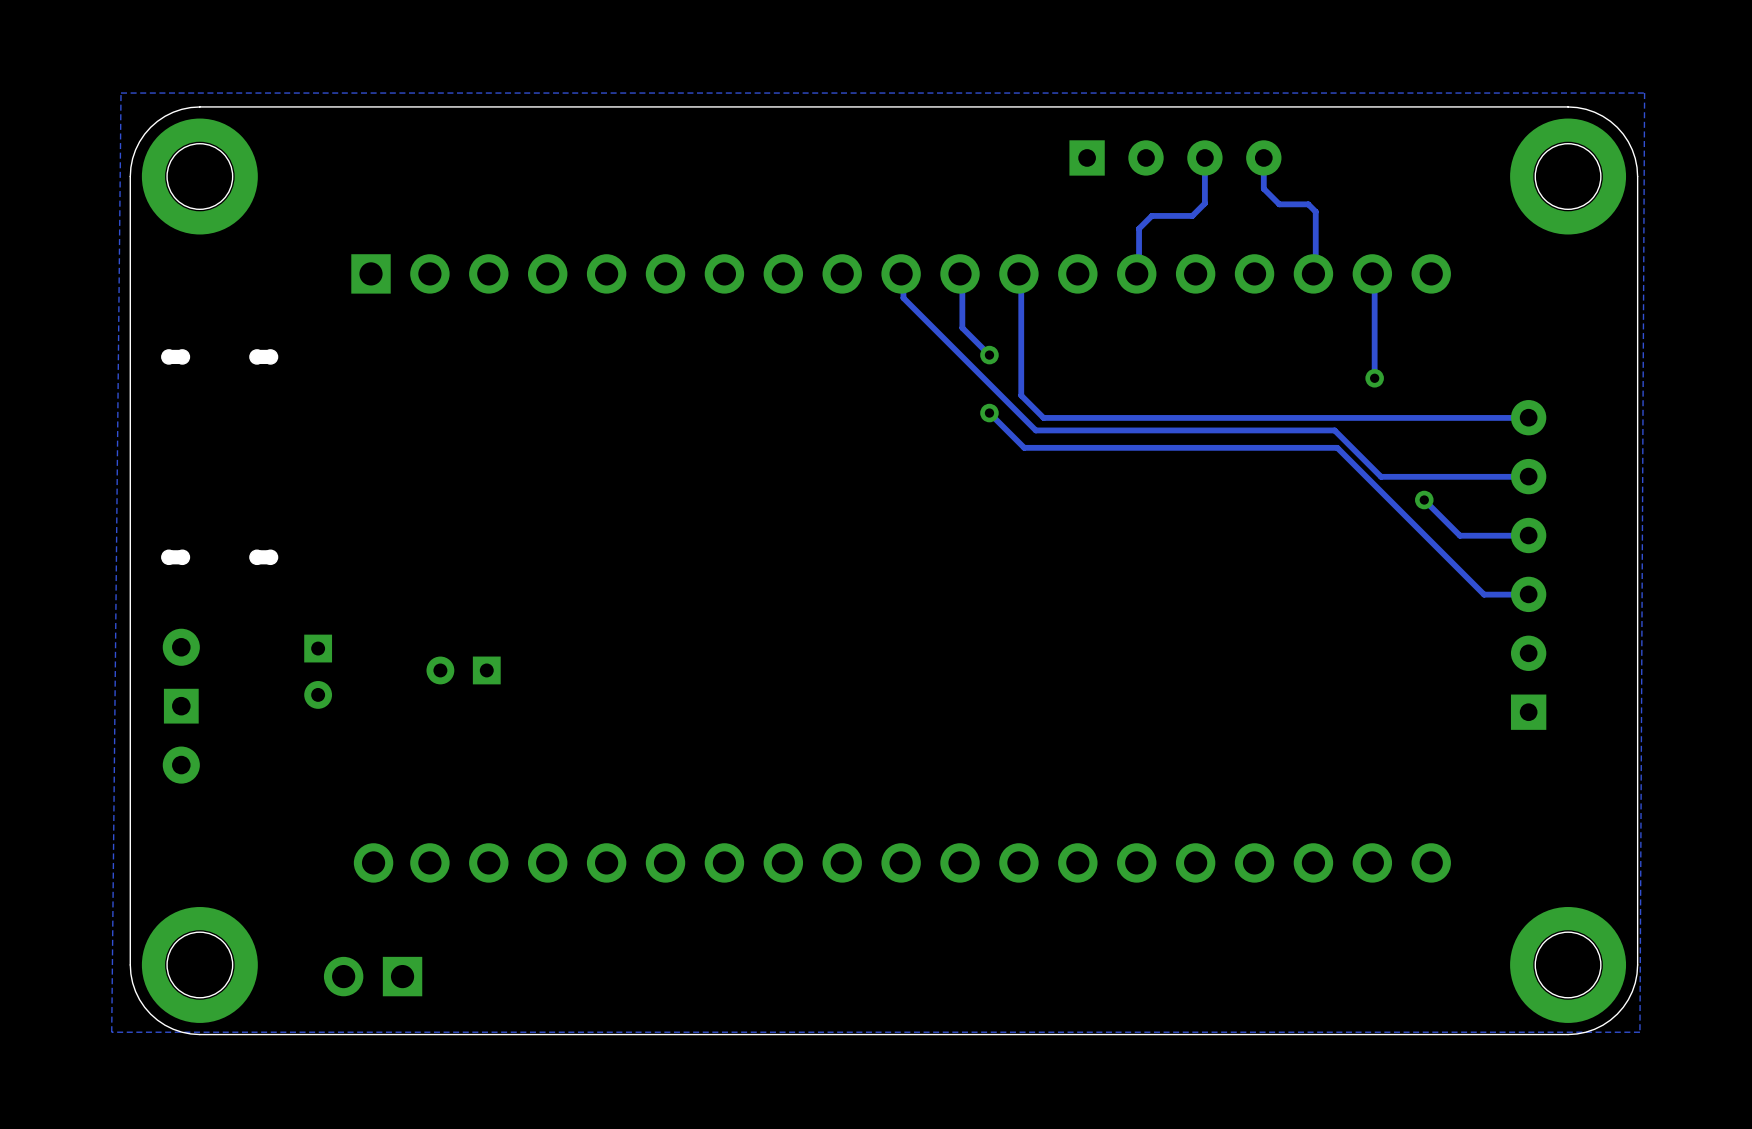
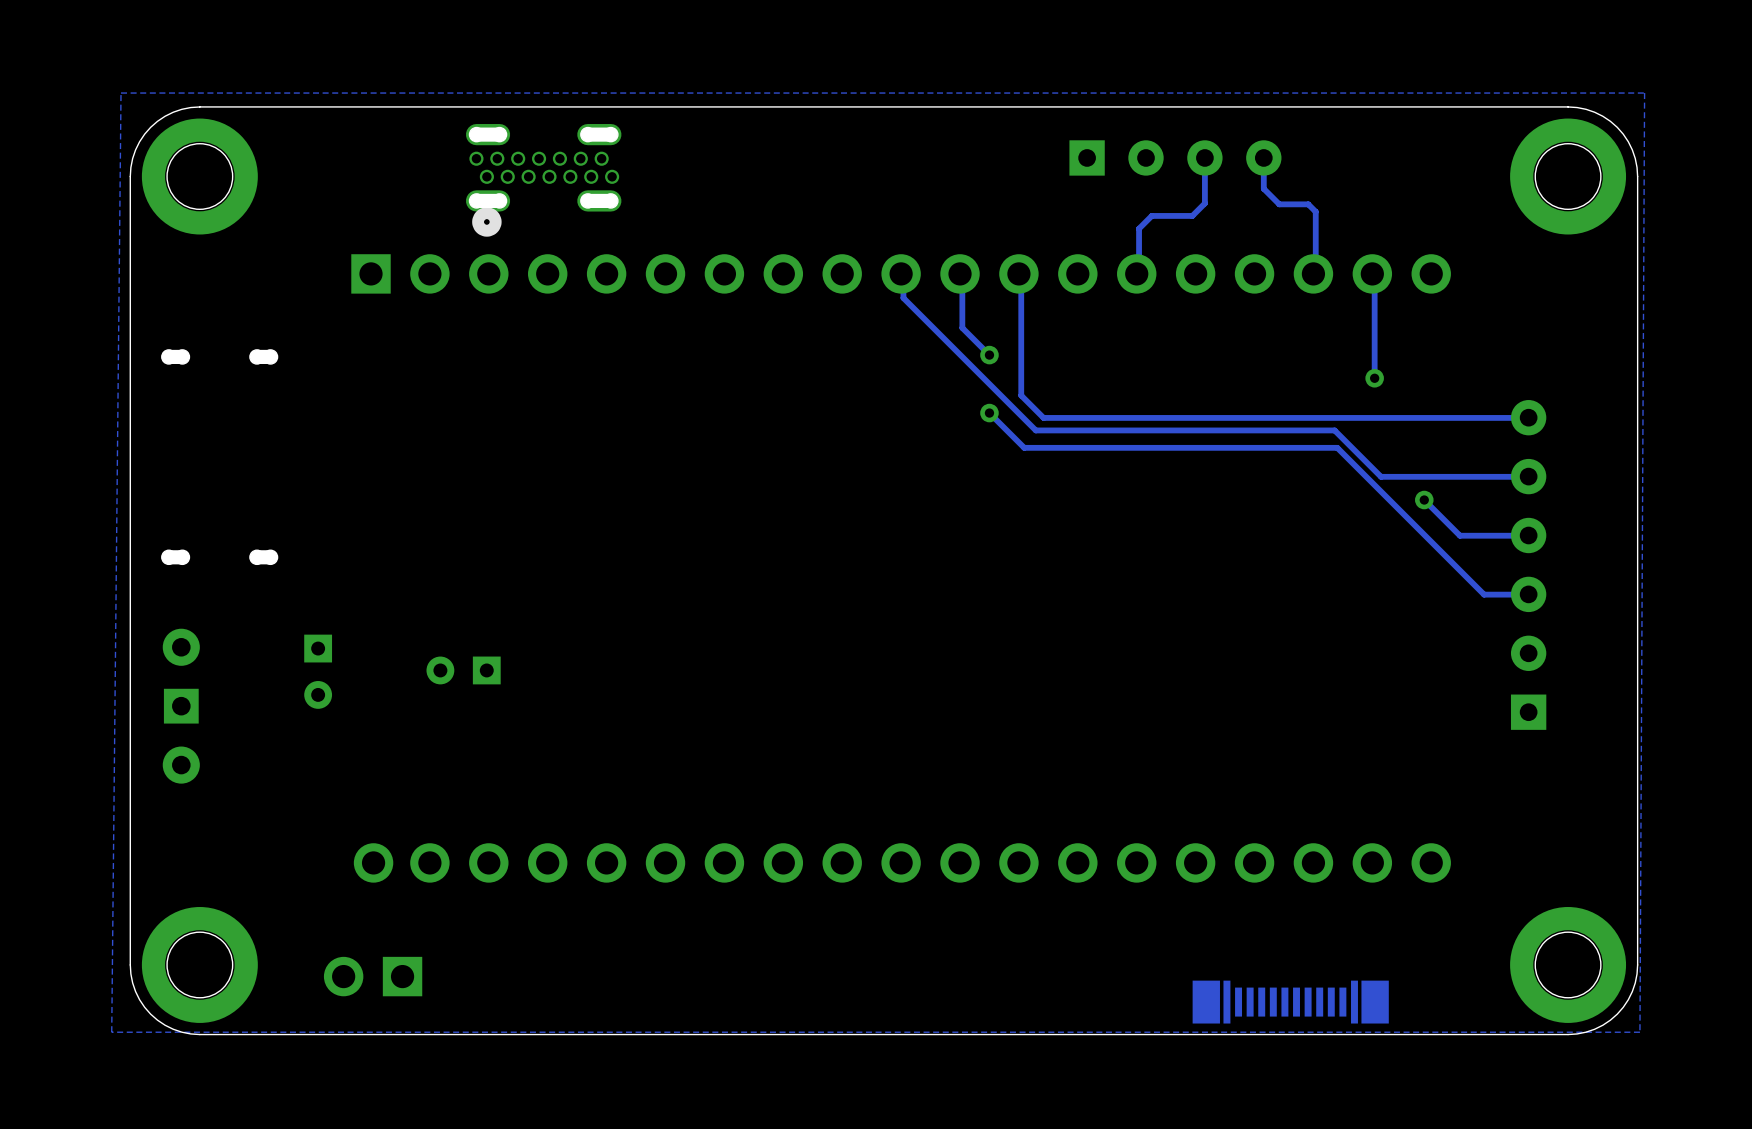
part: none -> (543, 180)
part: none -> (1290, 1002)

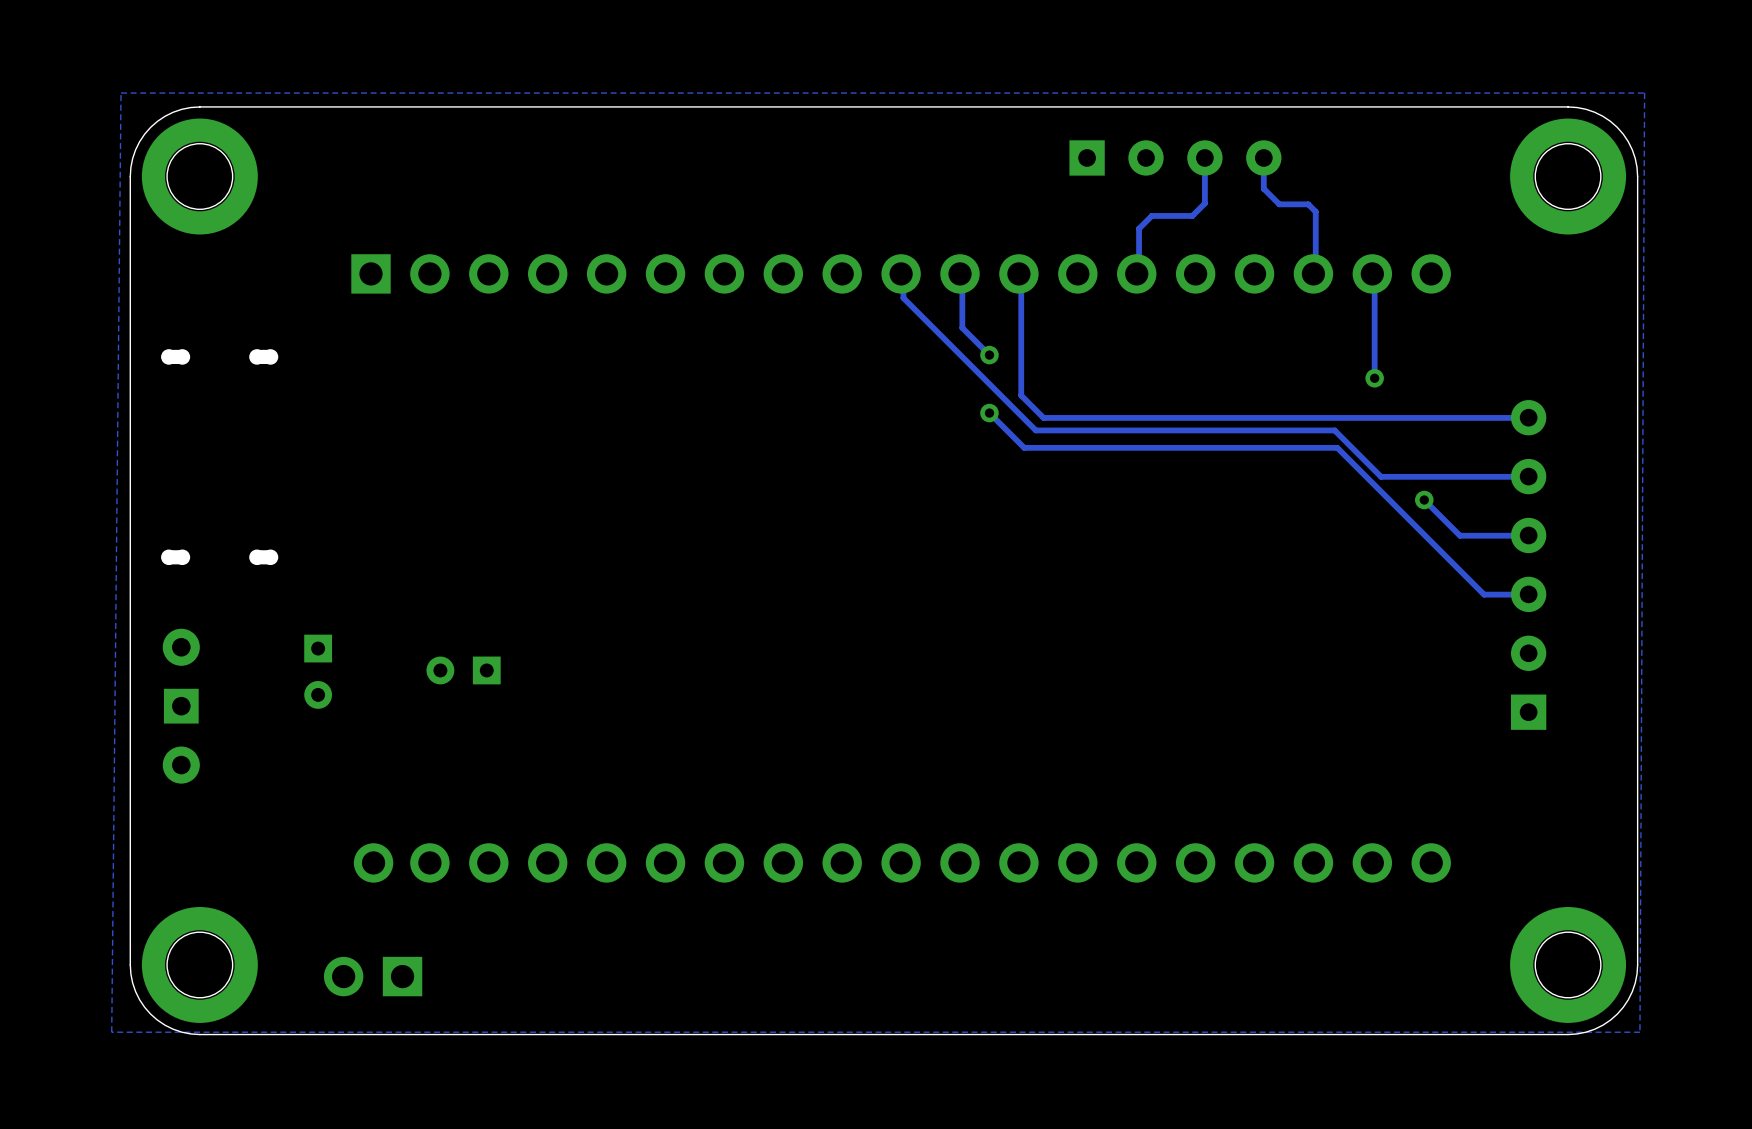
part: (543, 180) -> none
part: (1290, 1002) -> none

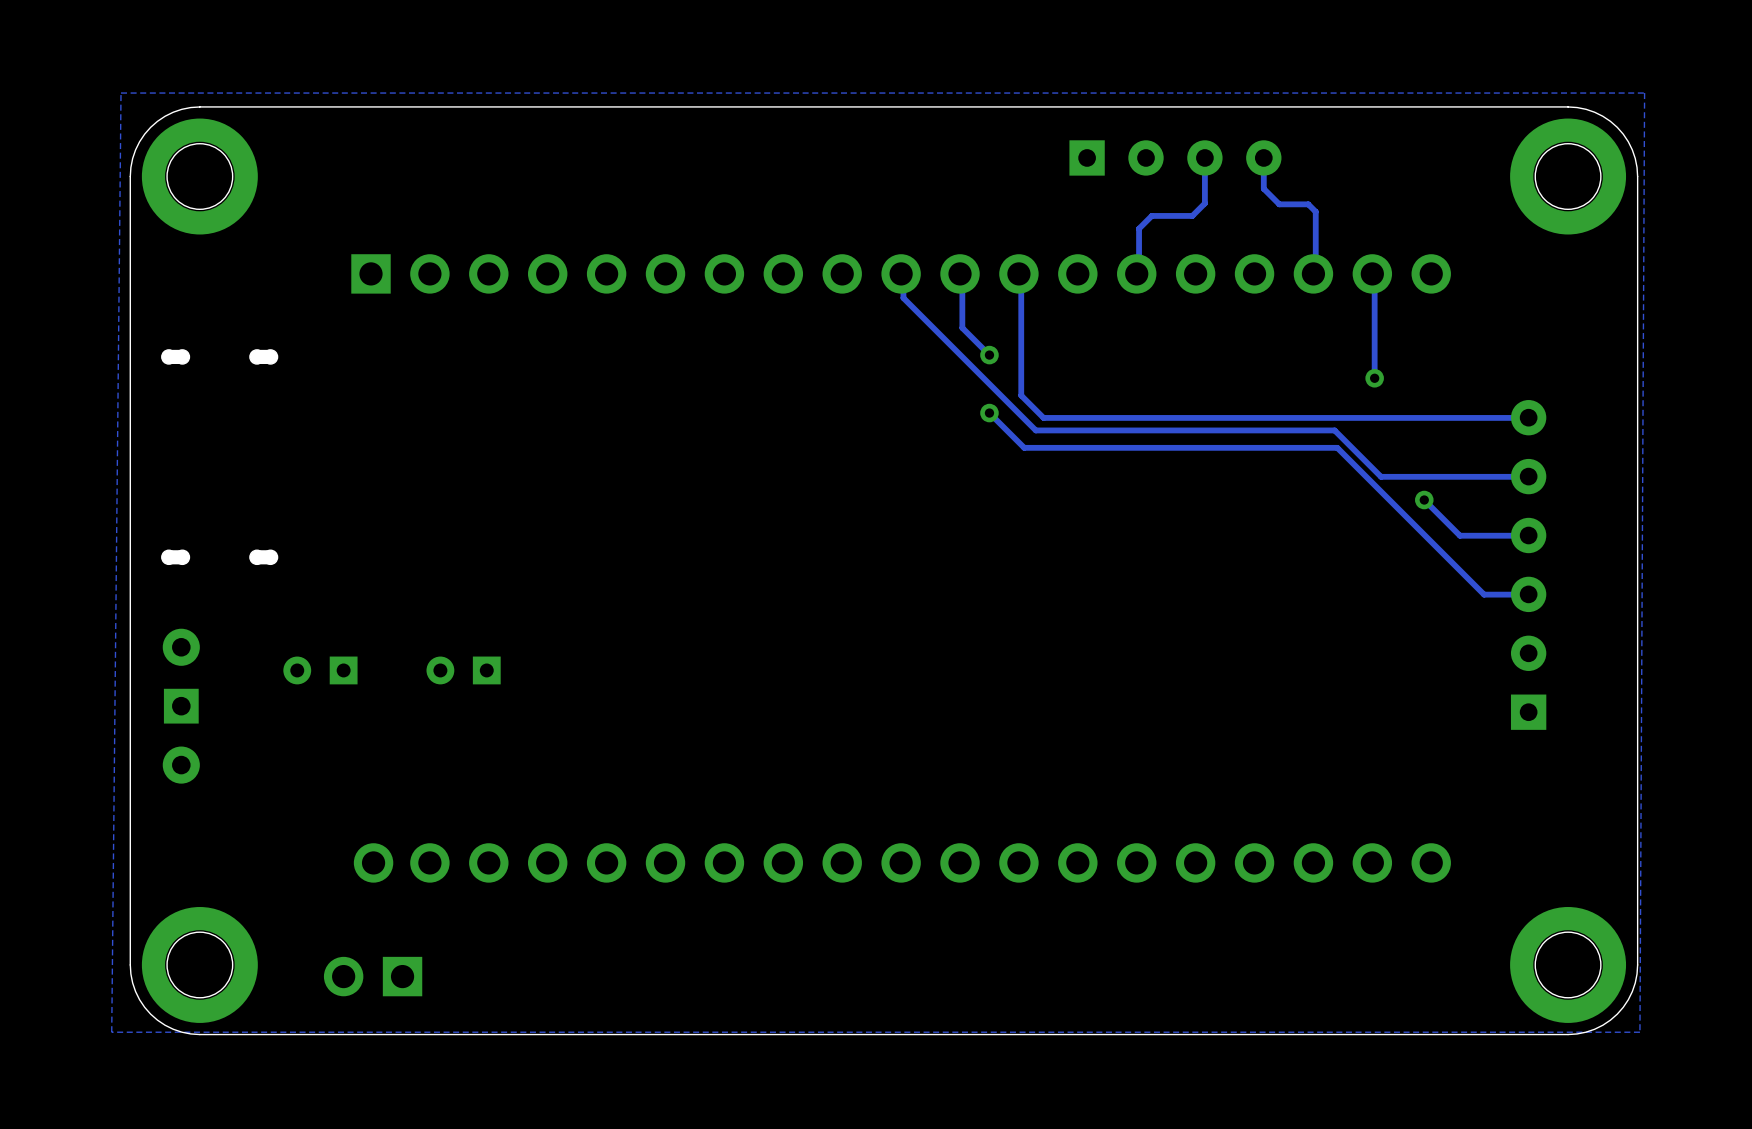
part rotation: 0° (318, 671) -> 90° clockwise (320, 670)

